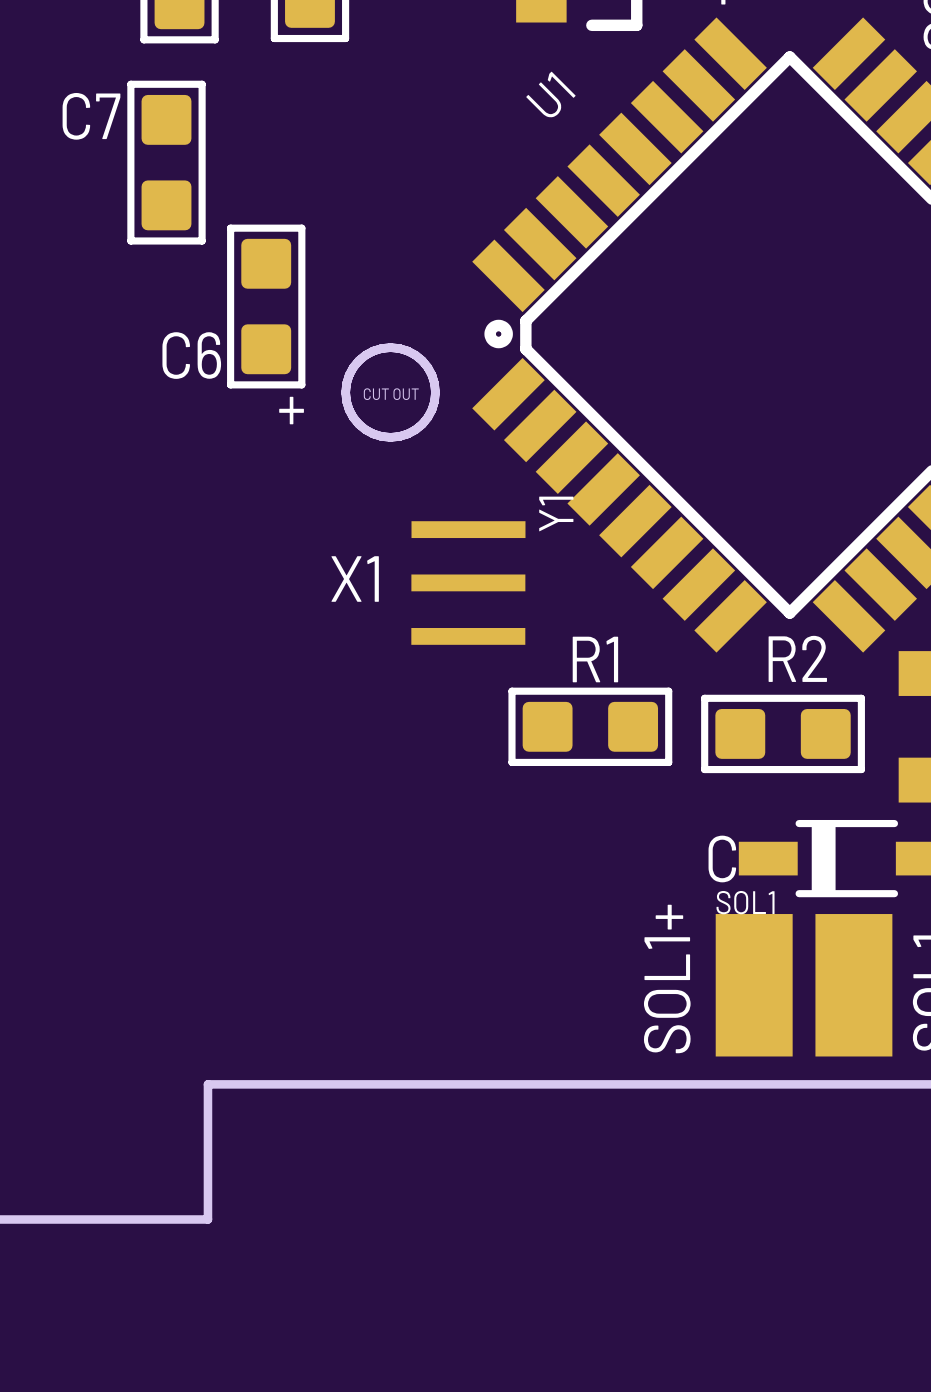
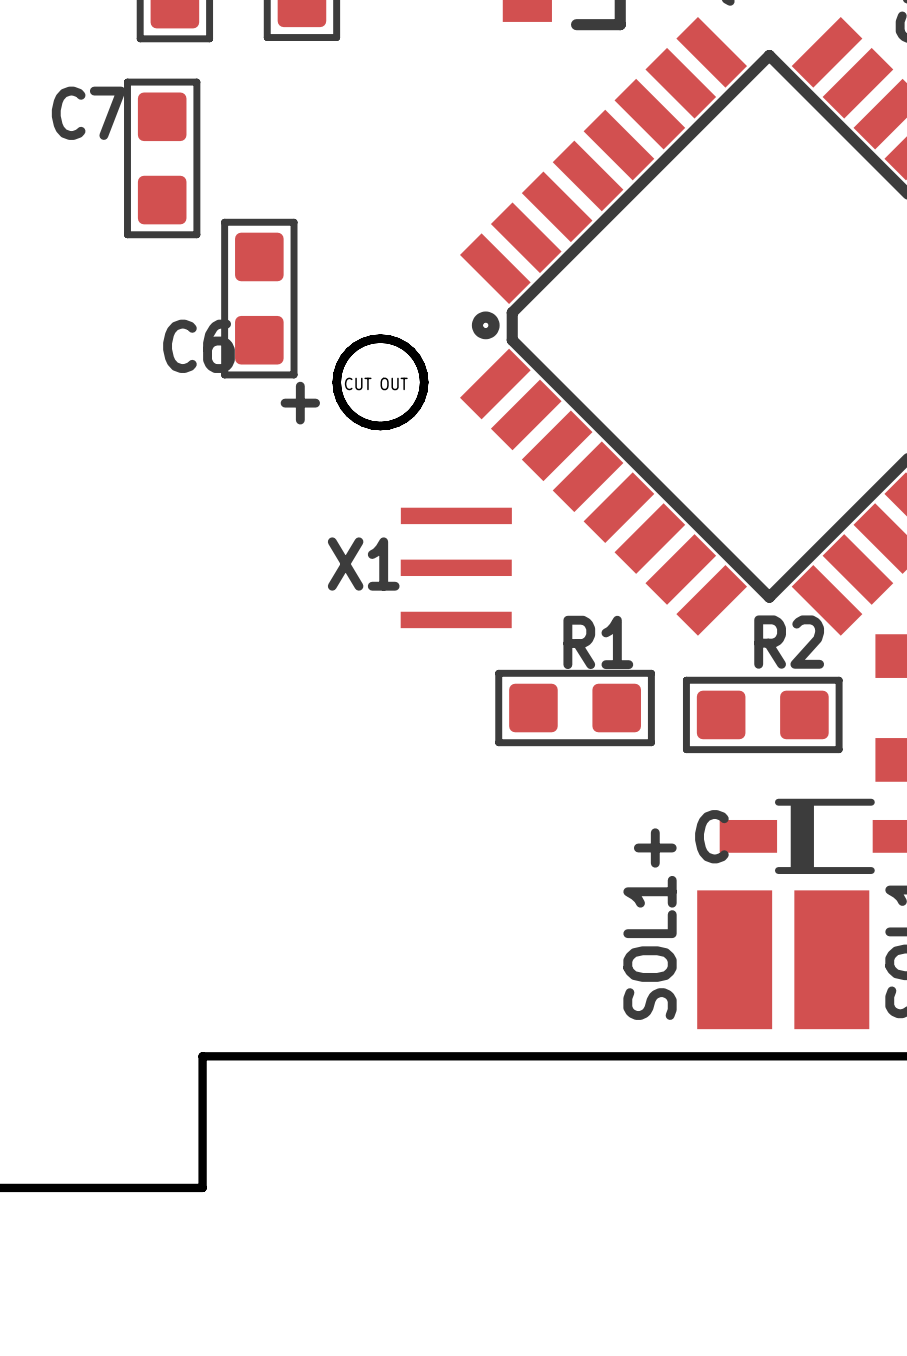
U1 name: U1 (550, 94) -> none
Y1 name: Y1 (556, 513) -> none
SOL1 name: SOL1 (745, 902) -> none

